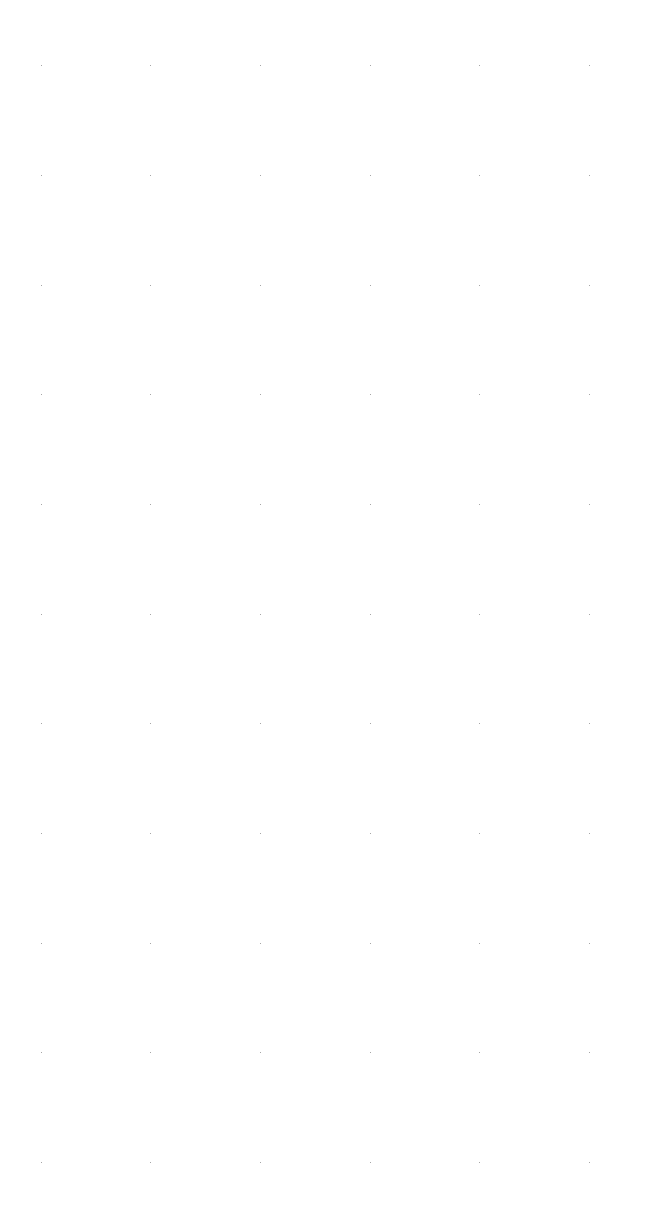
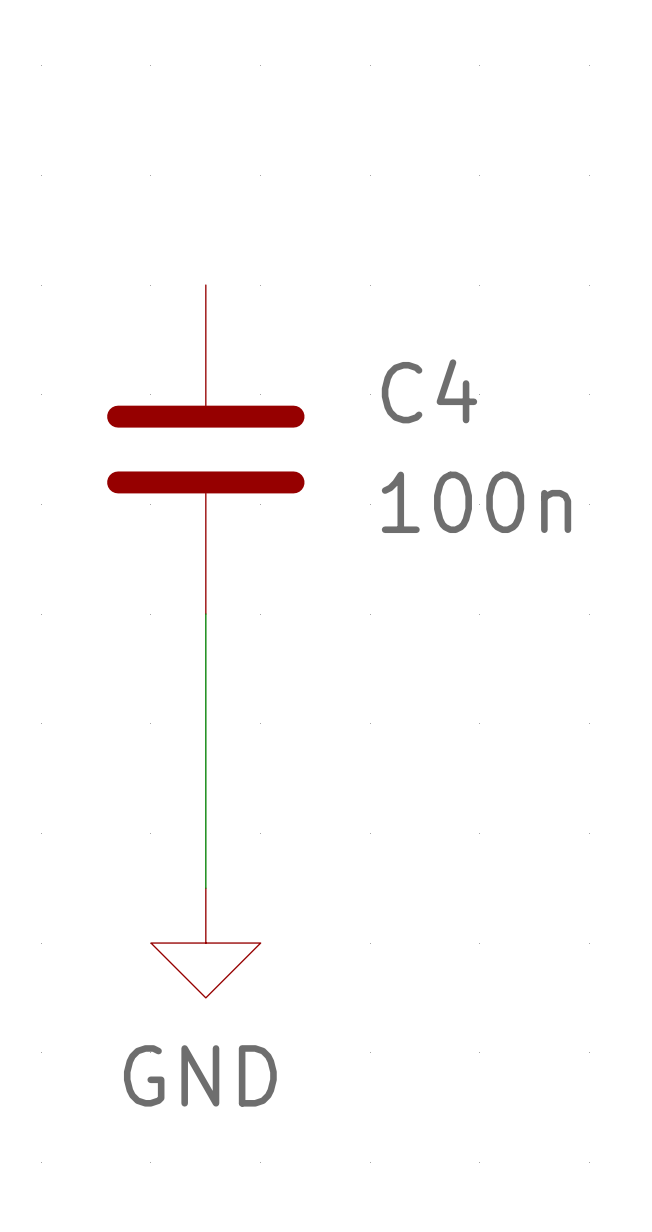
C4: none -> 100n (205, 449)
wire: none -> (205, 614) (205, 888)
power symbol: none -> GND (205, 943)

